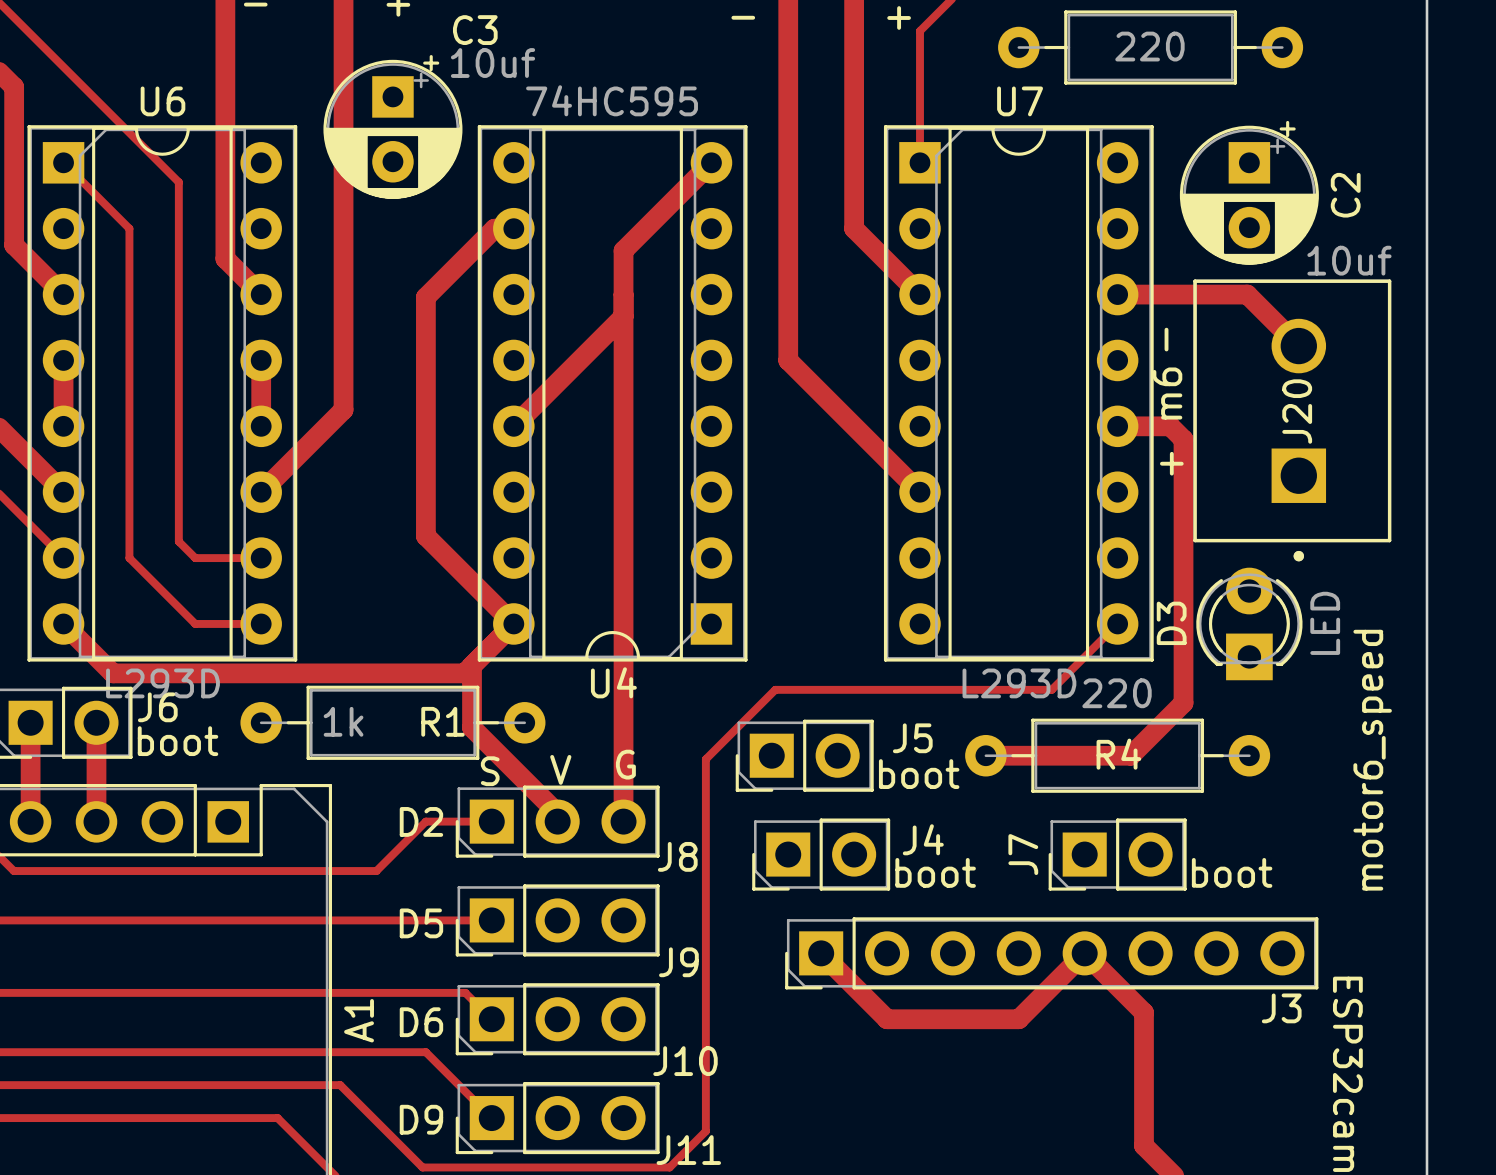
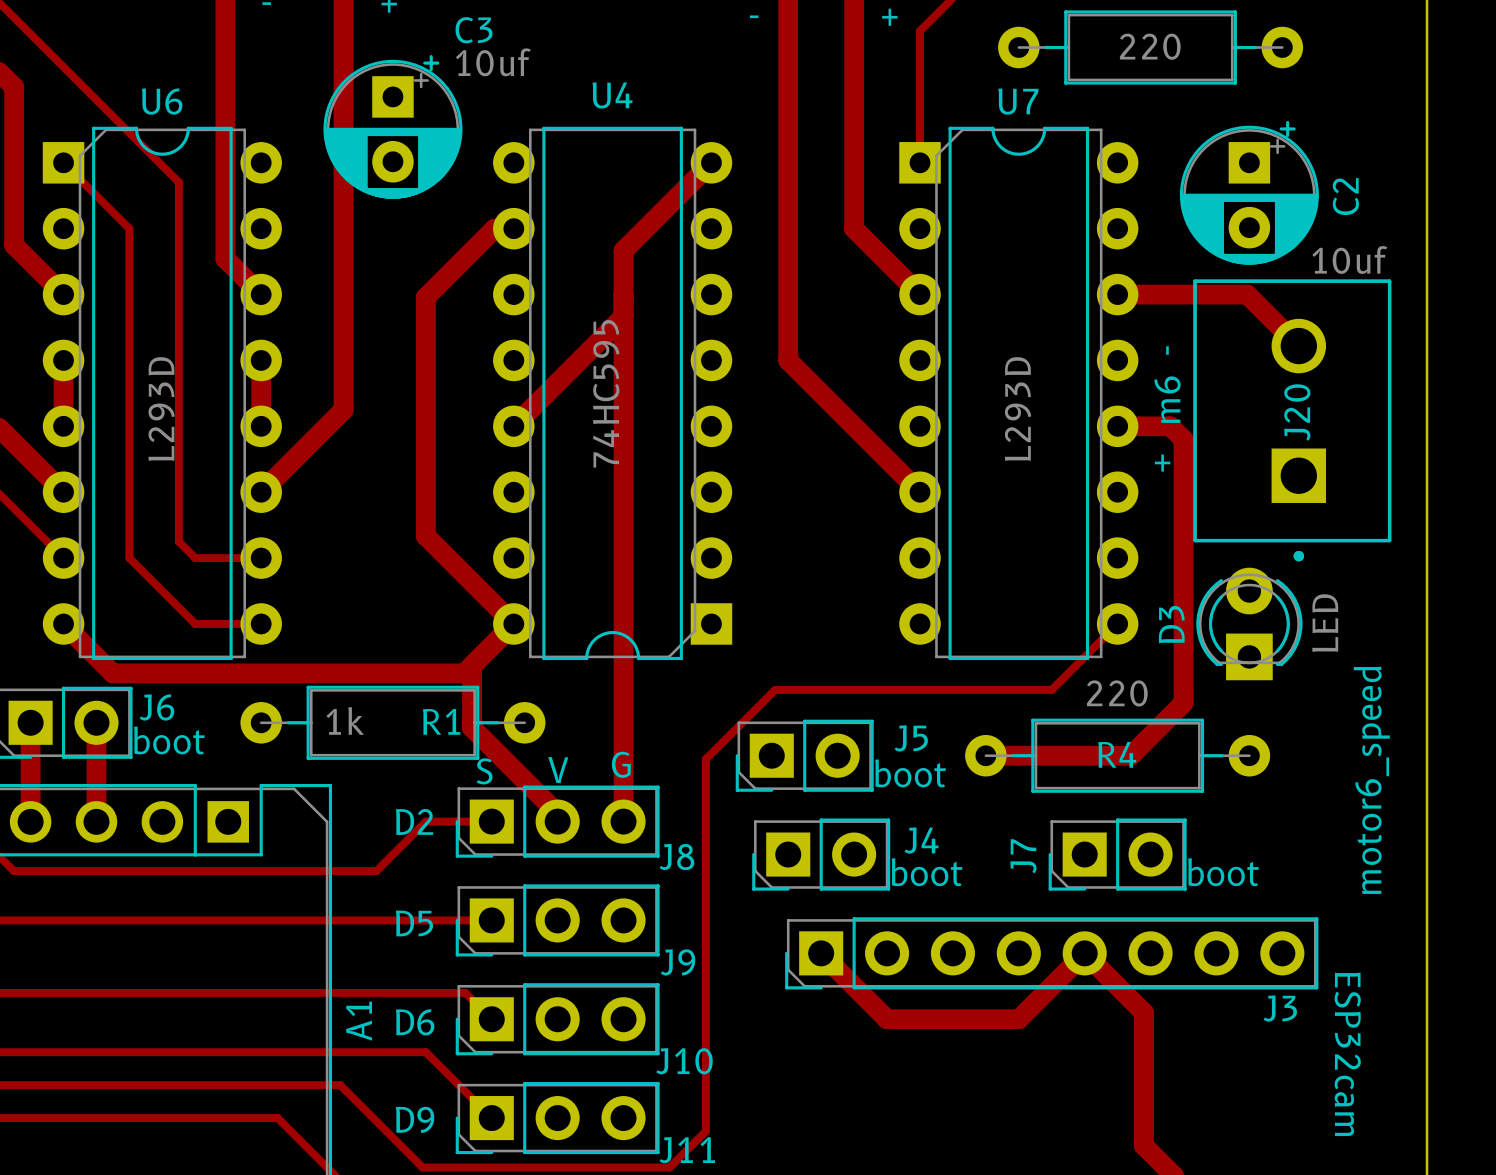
U4 value position: 74HC595 (612, 100) -> 74HC595 (606, 393)
U6 footprint: [27, 125, 298, 662] -> [42, 126, 282, 661]
U4 footprint: [477, 125, 748, 662] -> [493, 126, 733, 661]
U7 footprint: [883, 125, 1154, 662] -> [899, 126, 1139, 661]
U4 name position: U4 (613, 682) -> U4 (612, 95)
U6 value position: L293D (162, 683) -> L293D (161, 409)
U7 value position: L293D (1019, 683) -> L293D (1017, 409)

